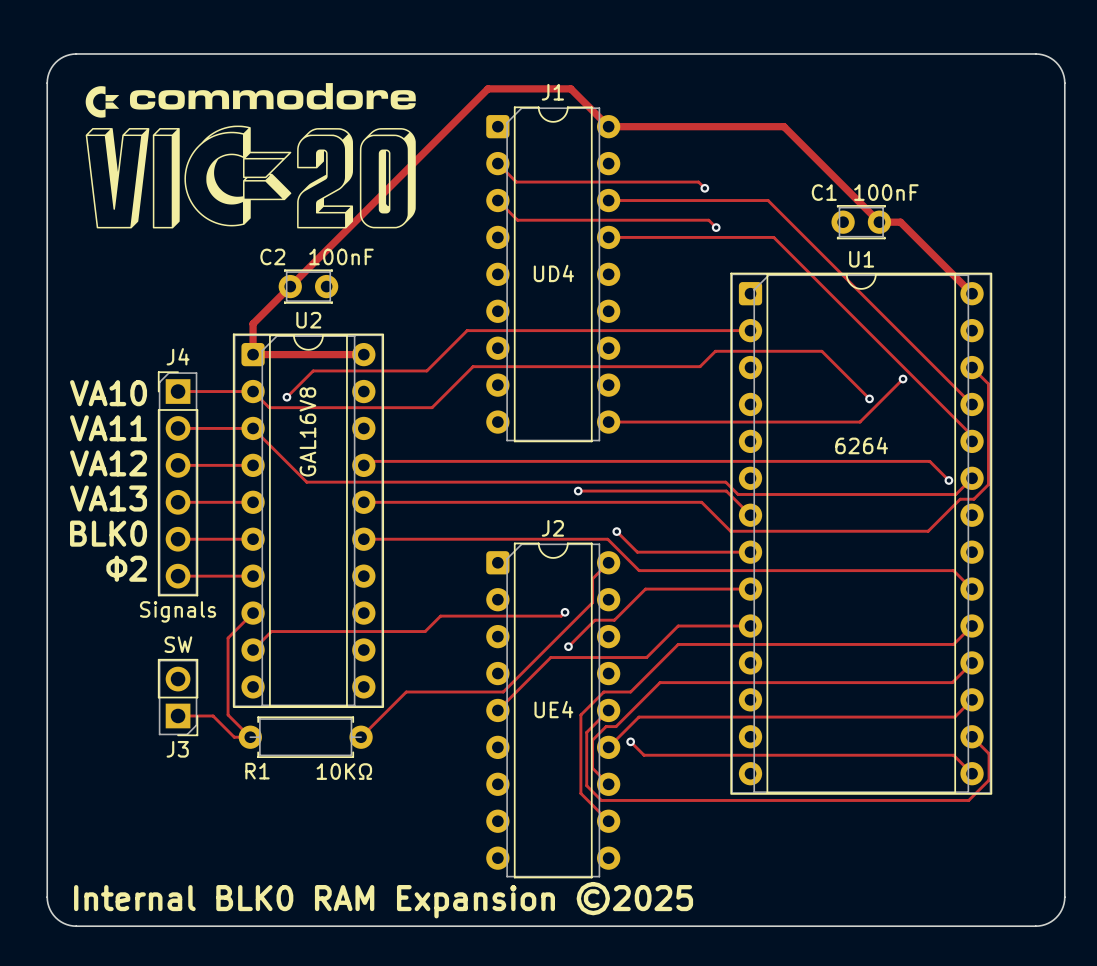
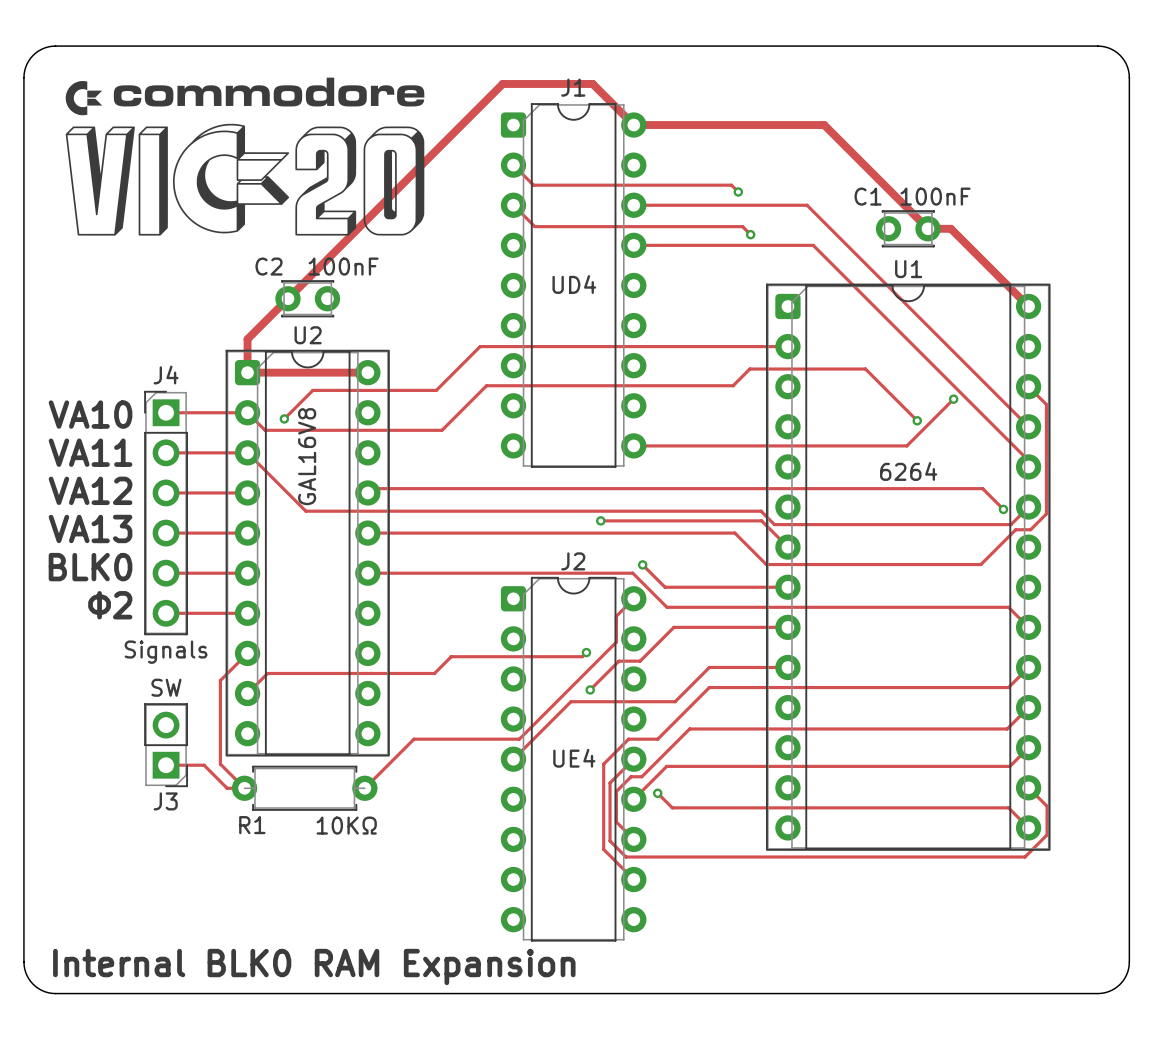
text: Internal BLK0 RAM Expansion ©2025 (383, 900) -> Internal BLK0 RAM Expansion (314, 966)

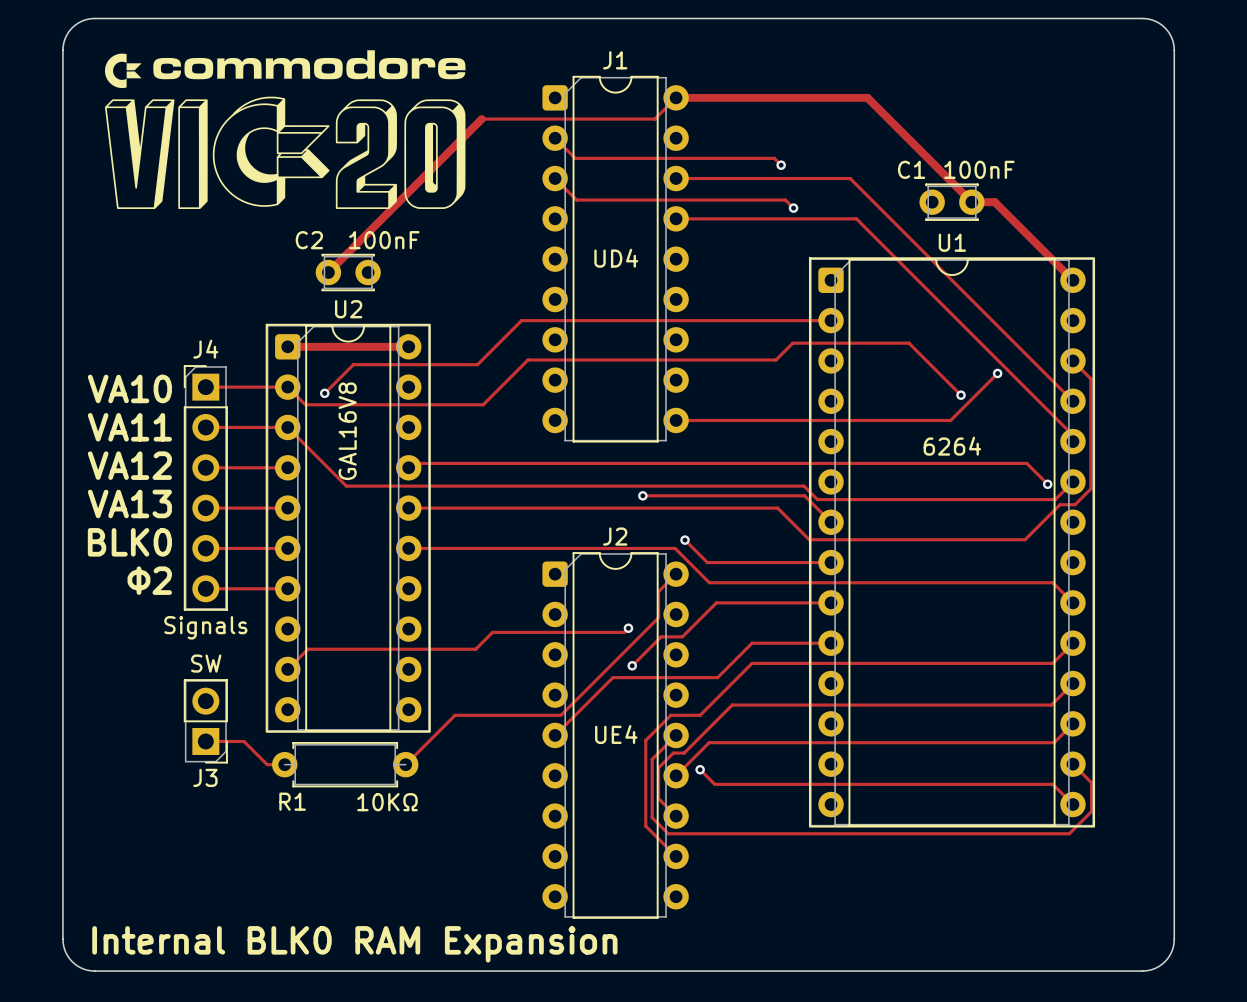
track: (633, 125) (592, 83) (502, 83) (440, 146) -> (676, 97) (654, 119) (481, 119)
track: (287, 298) (247, 339) (247, 372) -> none
track: (247, 653) (220, 680) (220, 764) (244, 788) -> none

